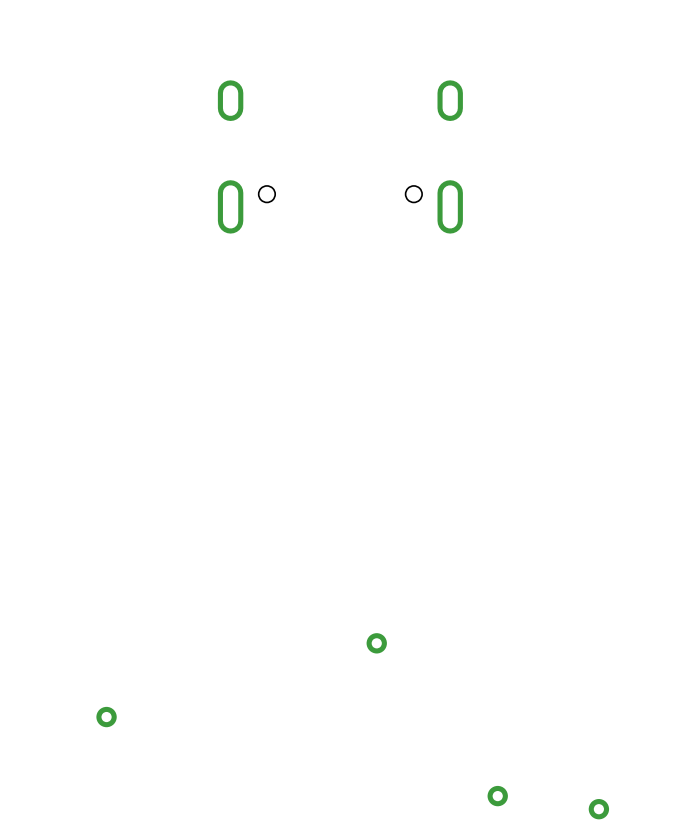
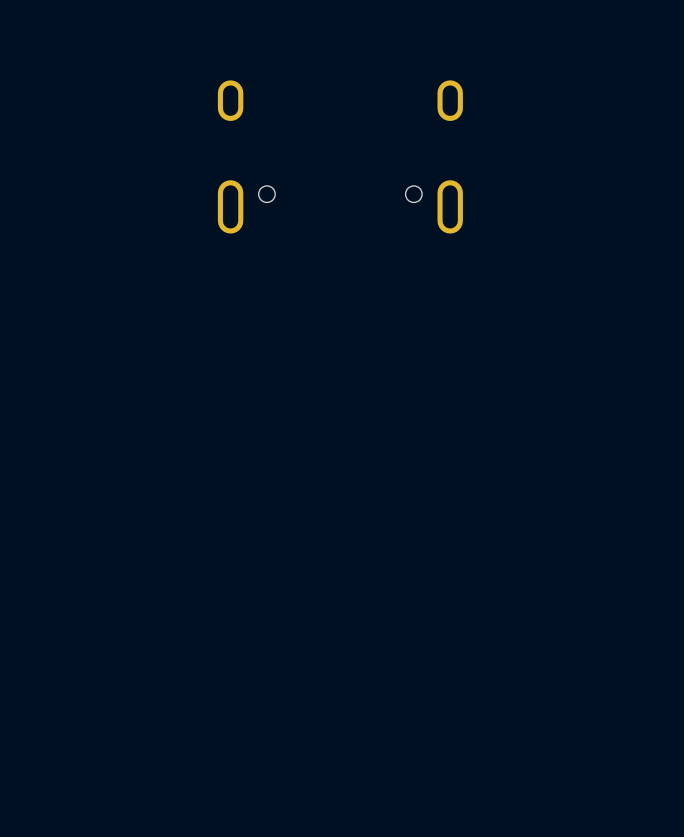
via: (376, 643) -> none
via: (106, 717) -> none
via: (497, 796) -> none
via: (598, 809) -> none

